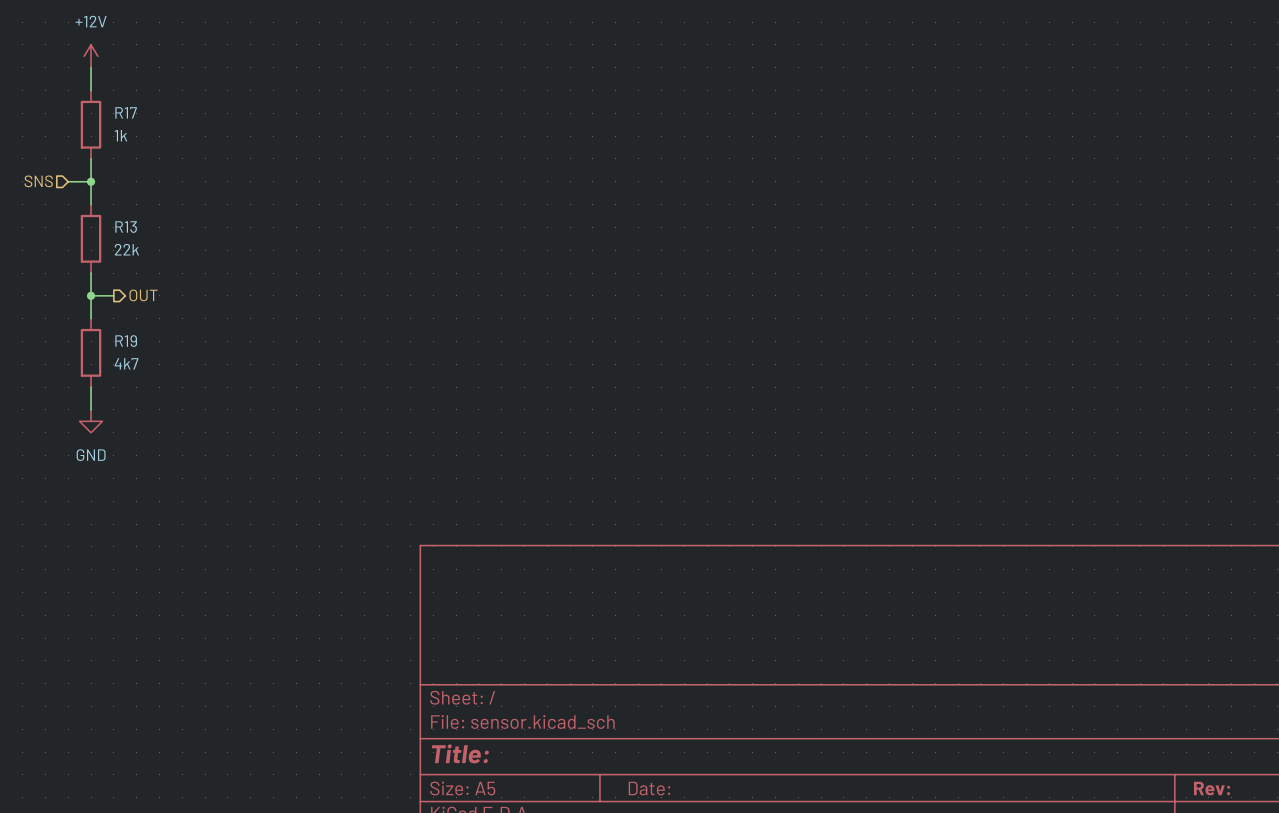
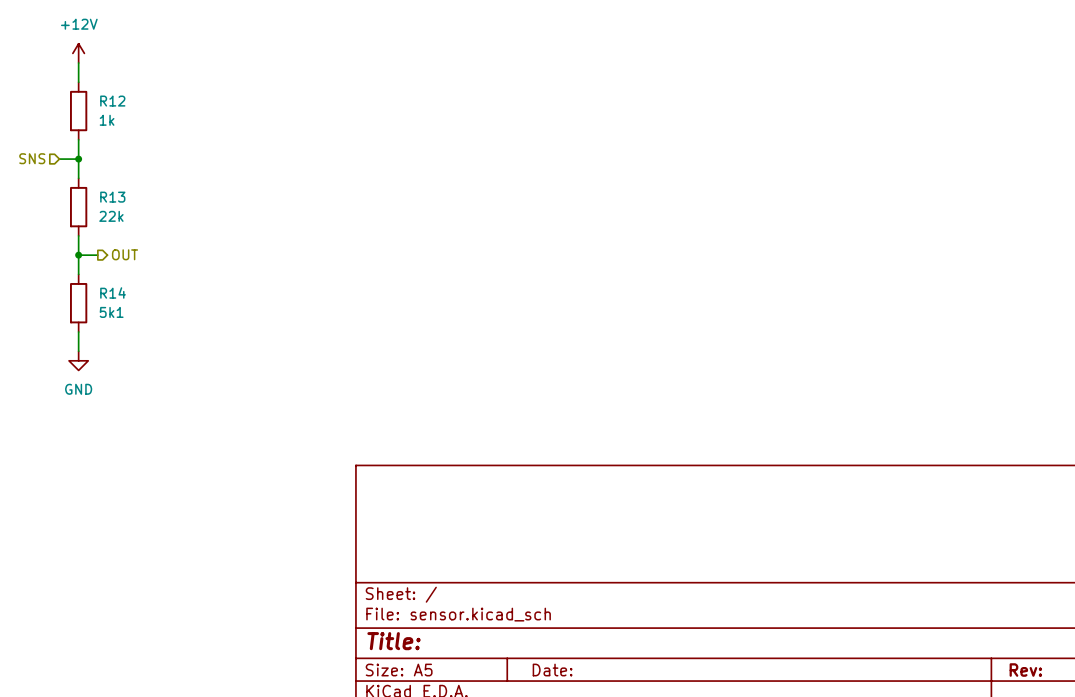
R17 name: R17 (126, 112) -> R12 (112, 101)
R19 name: R19 (126, 341) -> R14 (113, 292)
R19 value: 4k7 (126, 363) -> 5k1 (111, 312)

